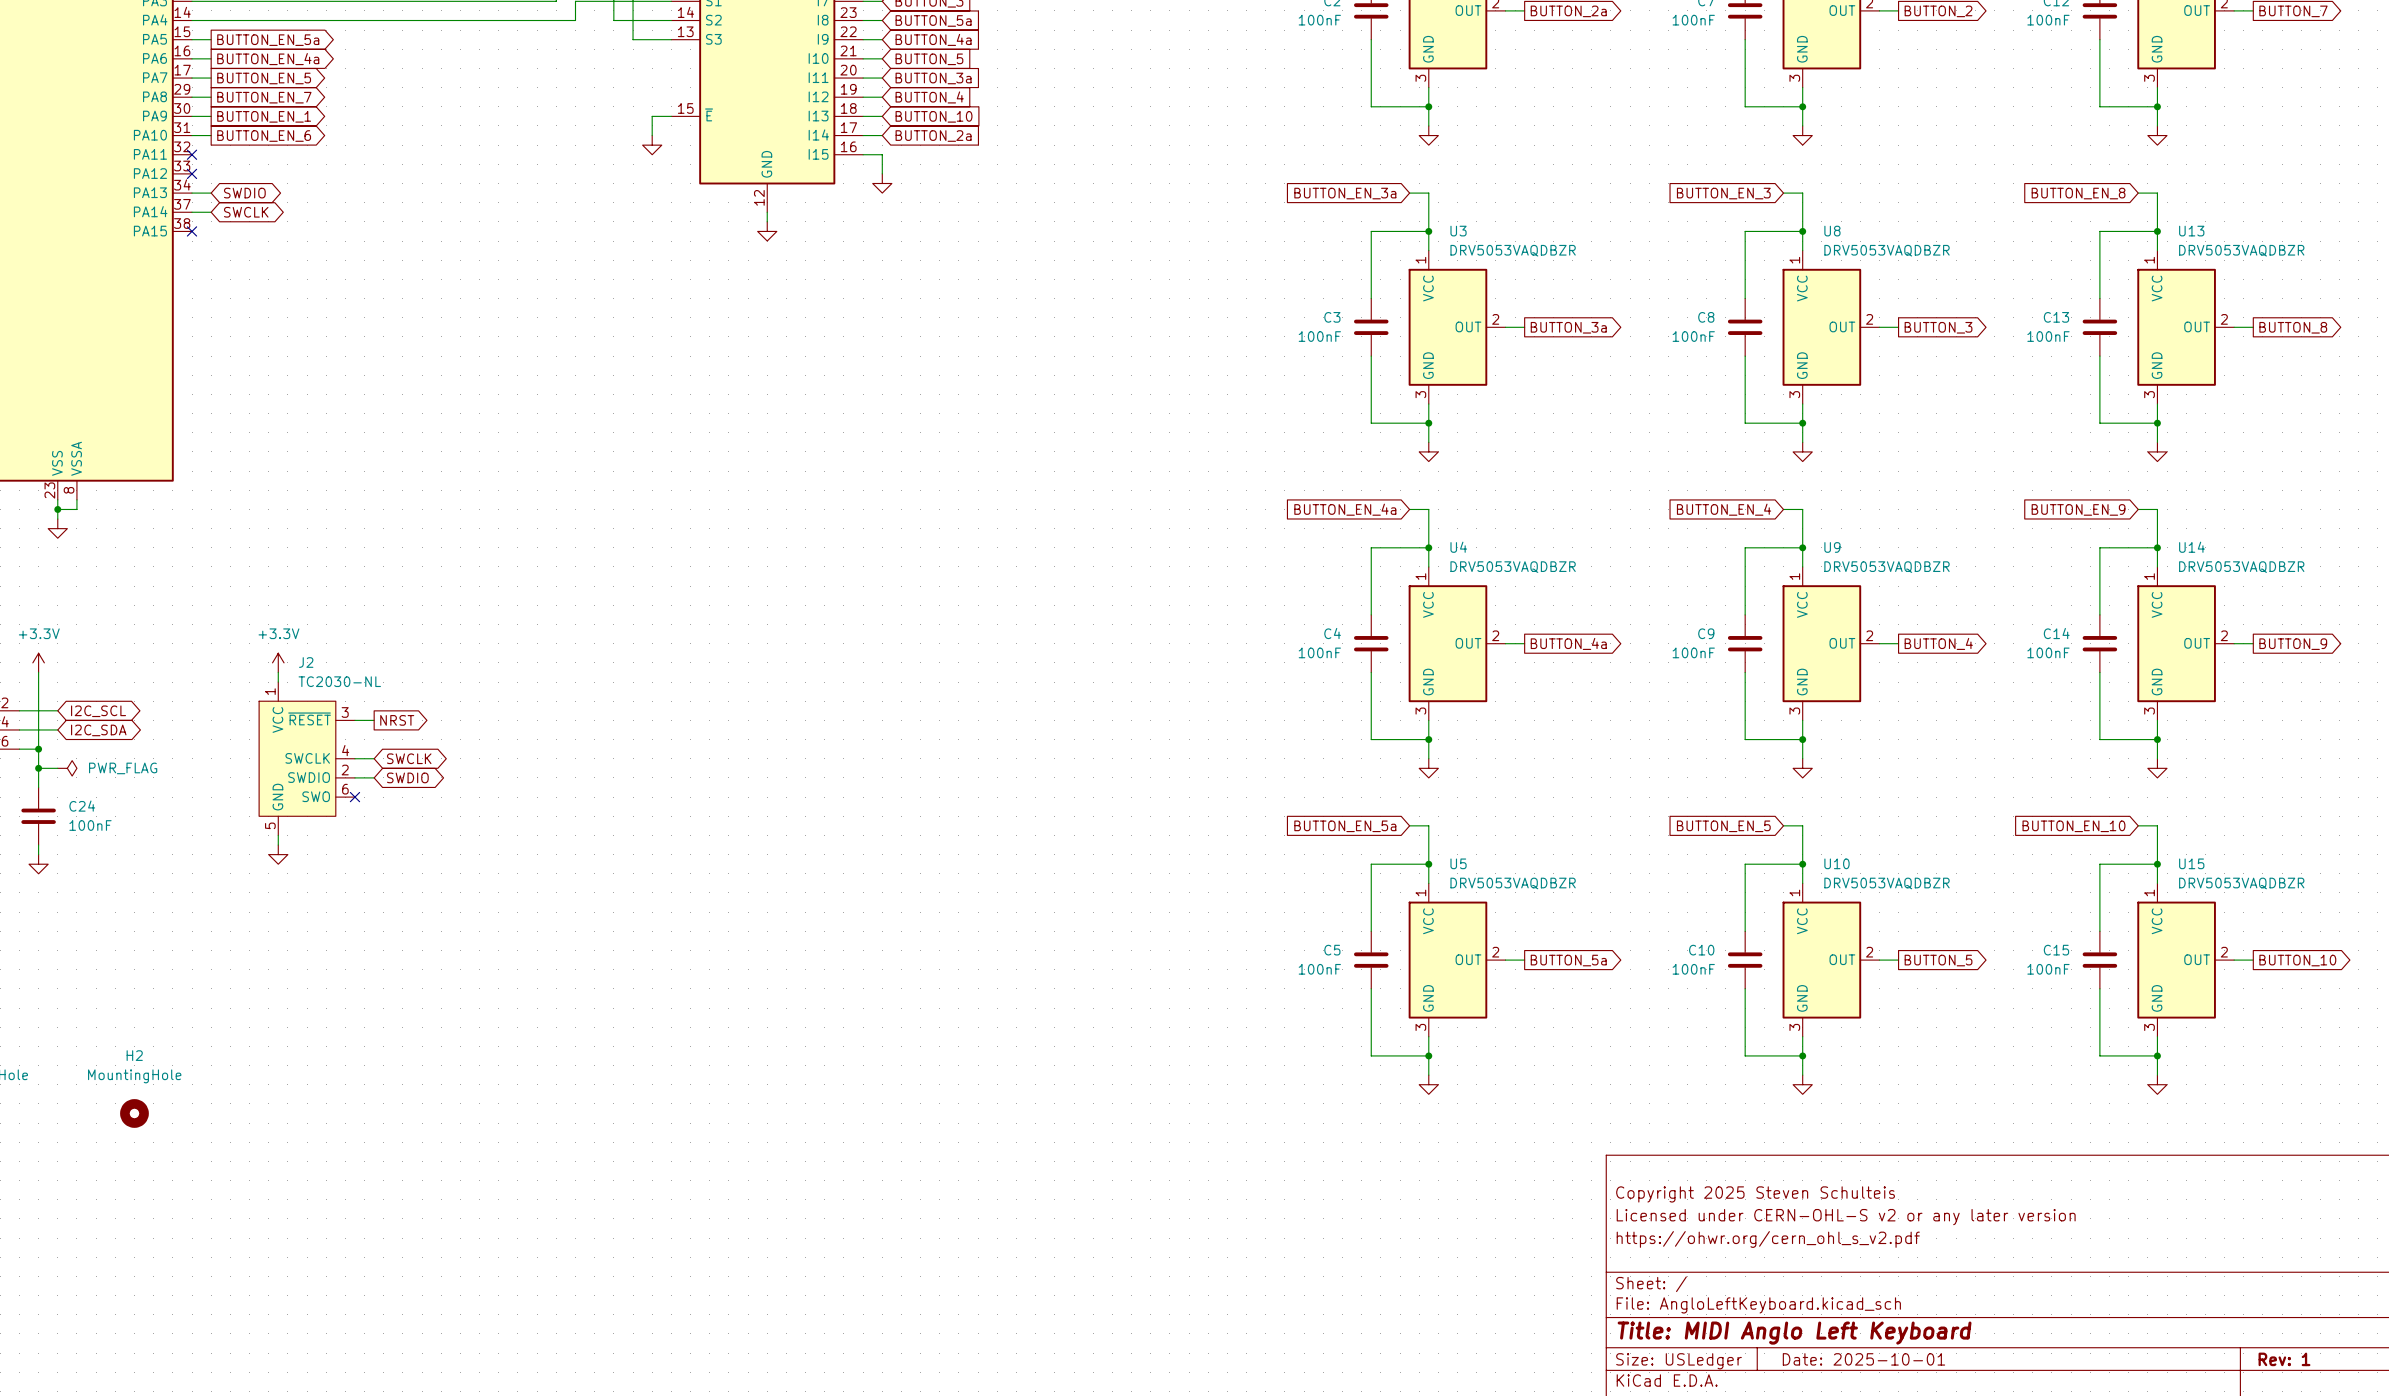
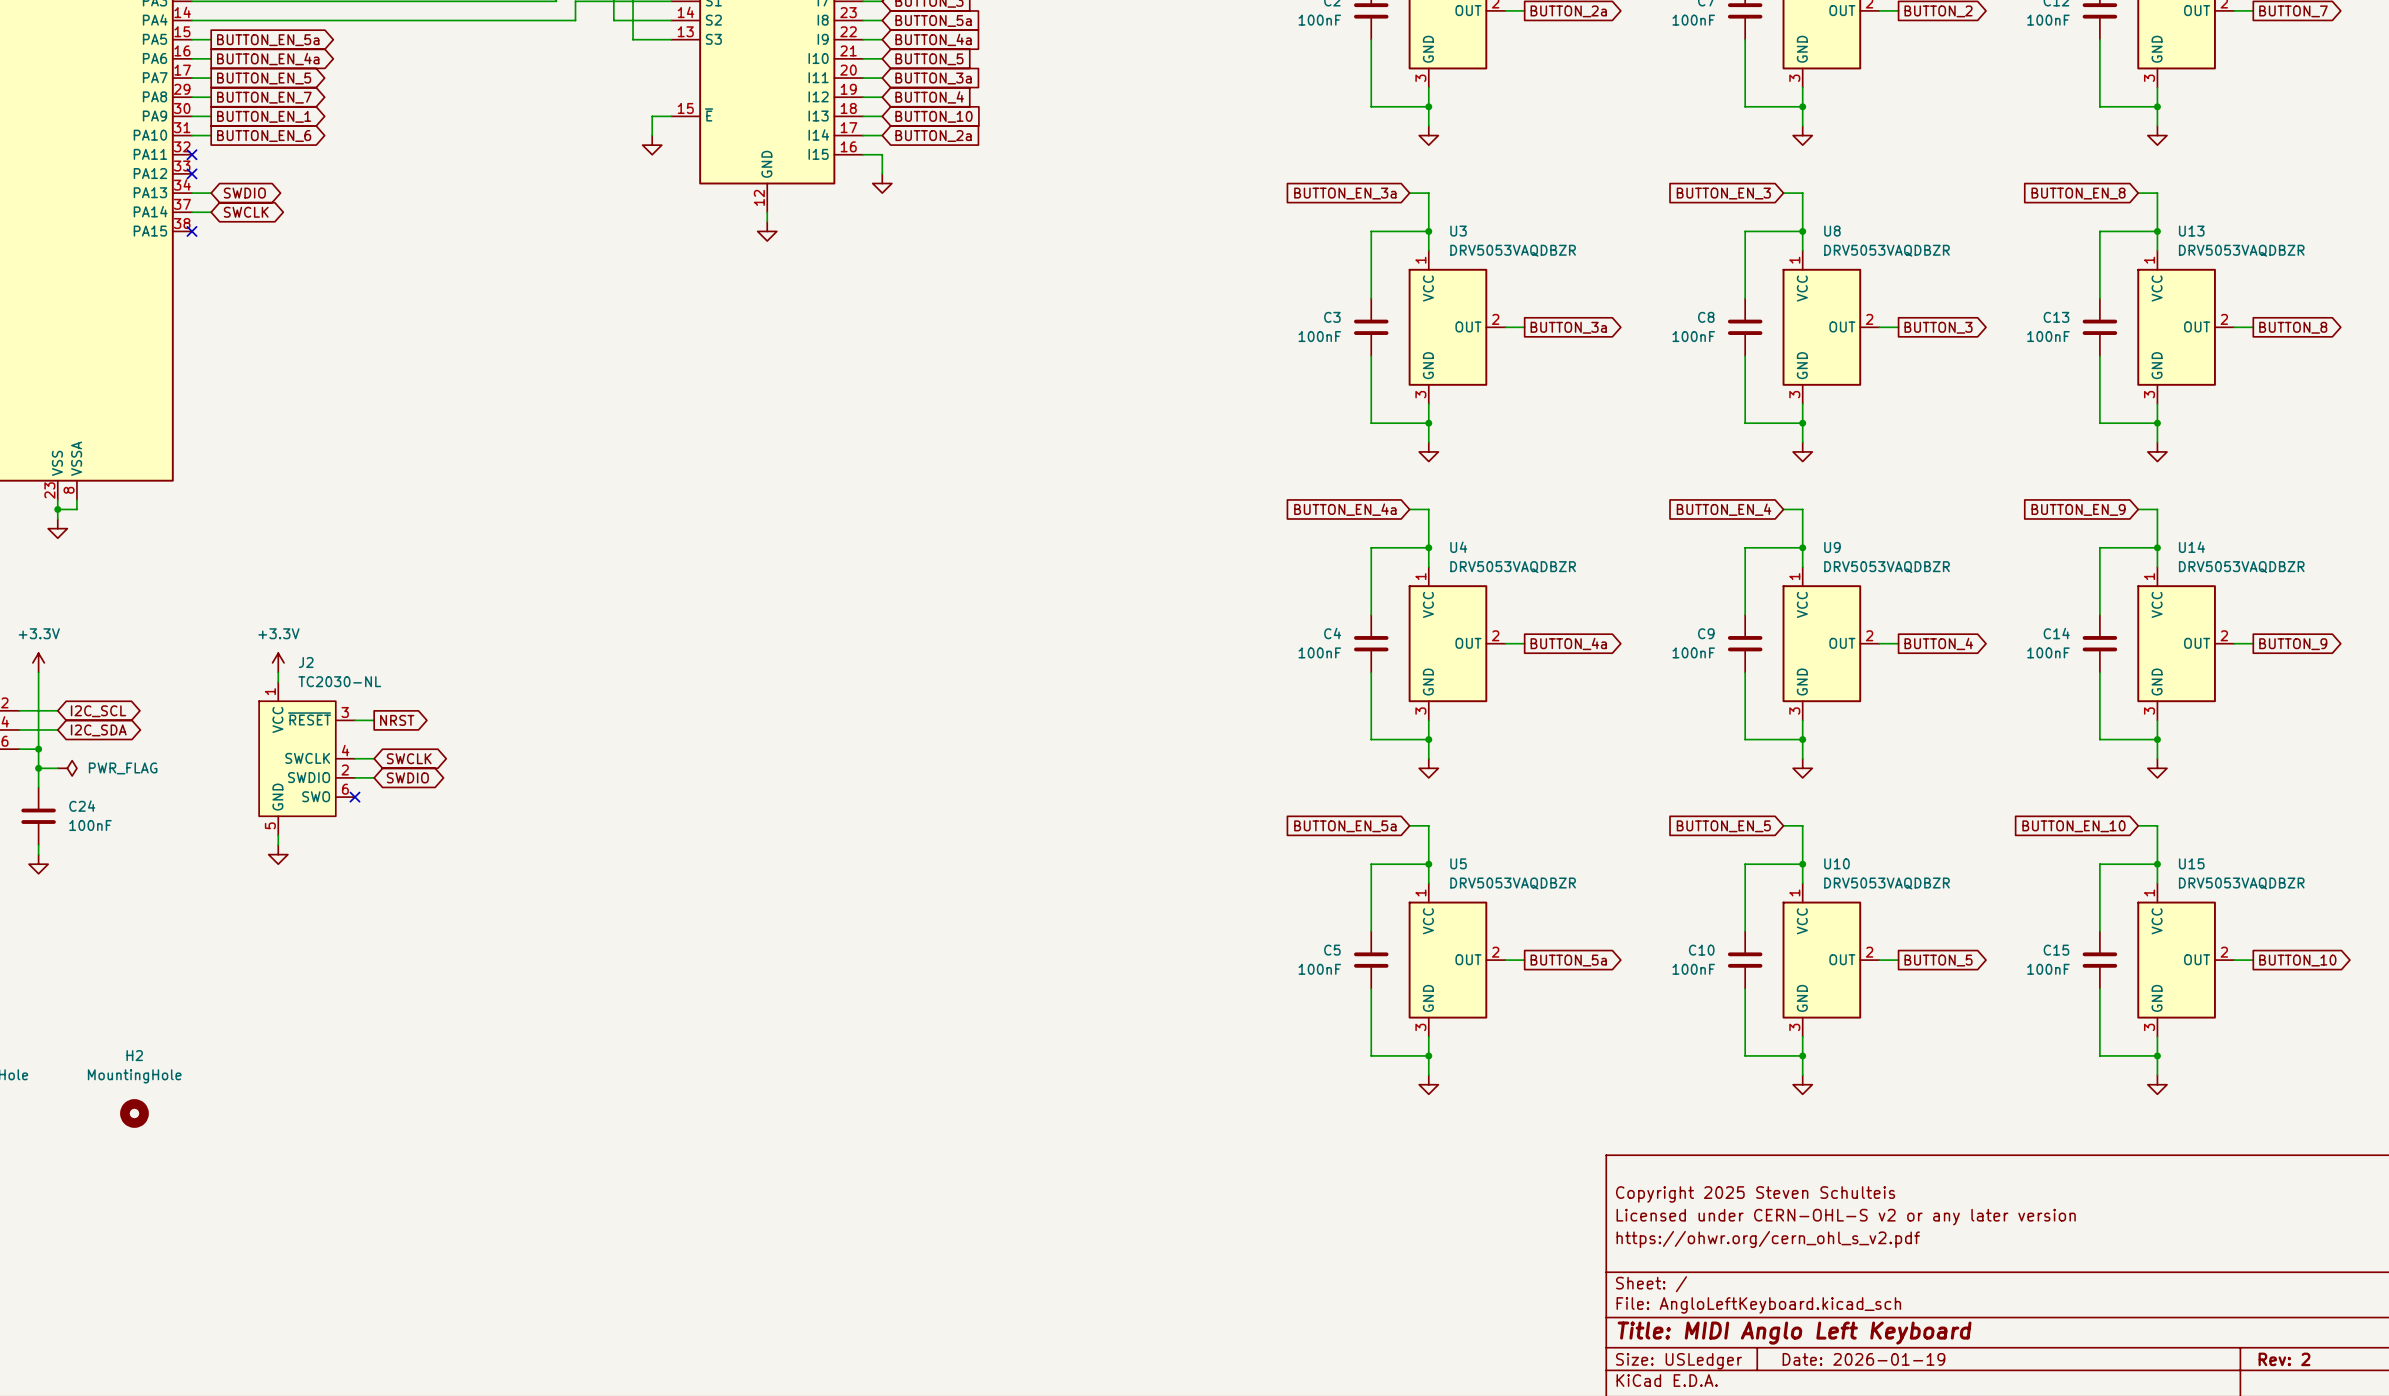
title block: Date: 2025-10-01 (1863, 1359) -> Date: 2026-01-19 (1863, 1359)
title block: Rev: 1 (2284, 1359) -> Rev: 2 (2284, 1359)

